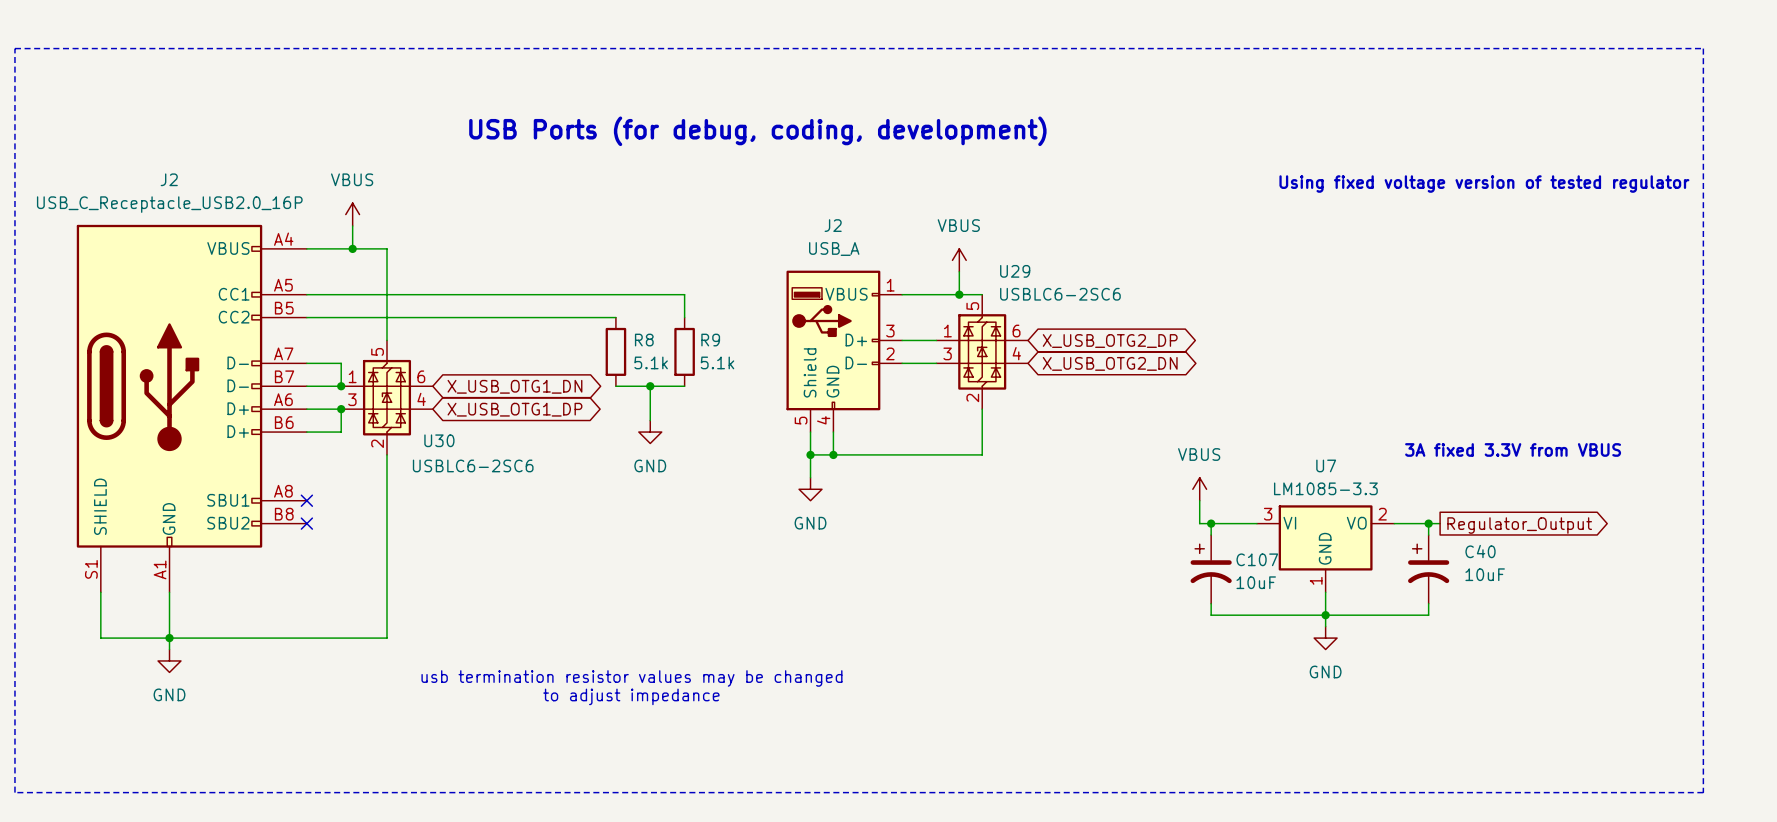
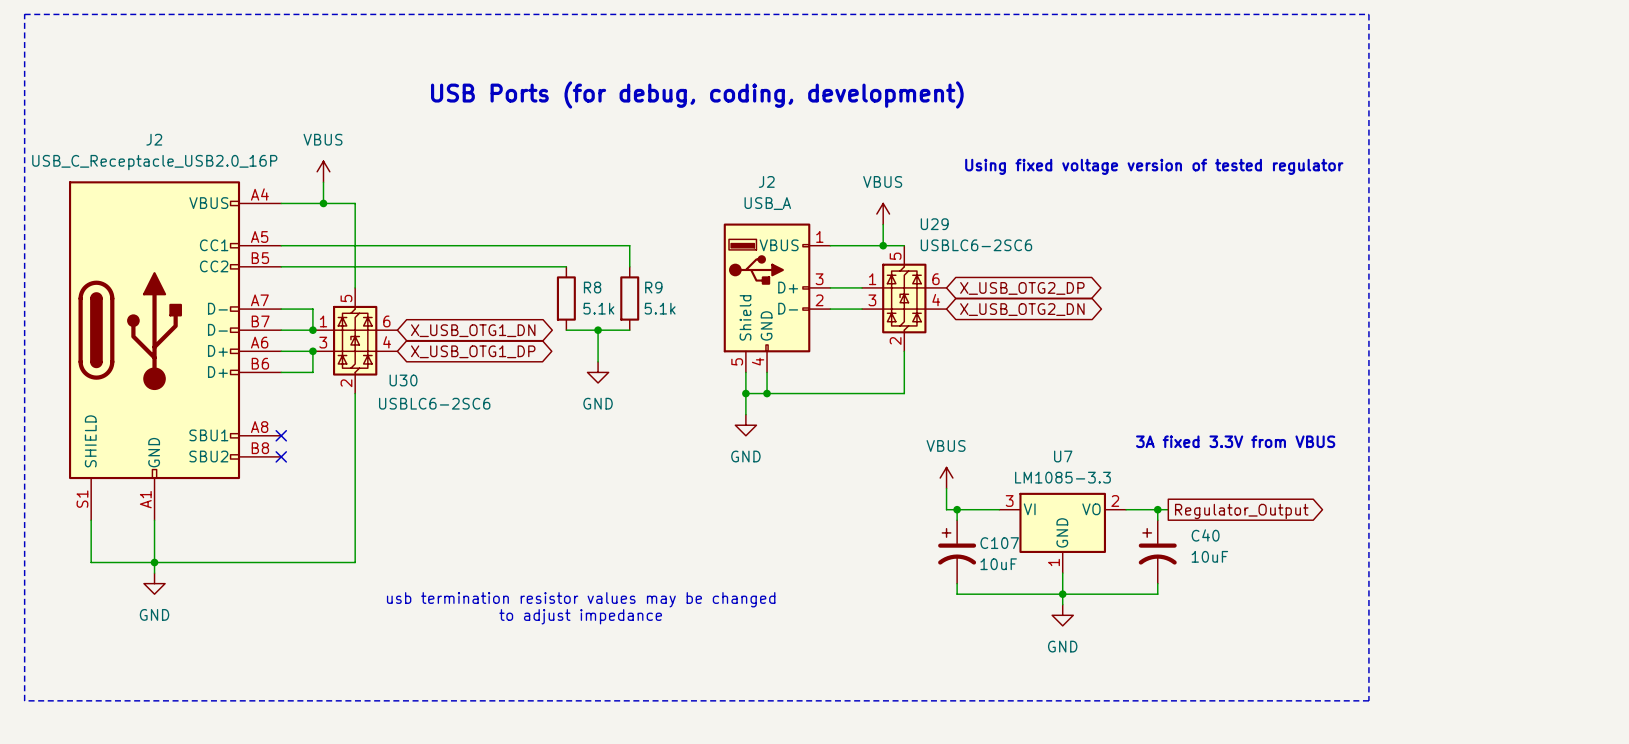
line: (14, 48) (1703, 48) (1703, 792) (14, 792) (14, 48) -> (24, 14) (24, 700) (1368, 700) (1368, 14) (24, 14)
text: Using fixed voltage version of tested regulator (1484, 184) -> none
text: none -> Using fixed voltage version of tested regulator (1154, 166)
text position: 3A fixed 3.3V from VBUS (1513, 449) -> 3A fixed 3.3V from VBUS (1235, 441)
power symbol position: VBUS (1199, 489) -> VBUS (946, 478)
wire: (1199, 500) (1199, 523) (1256, 523) -> (946, 488) (946, 509) (999, 509)
wire: (1211, 523) (1211, 535) -> (957, 509) (957, 520)
junction: (1211, 523) -> none
wire: (1394, 523) (1440, 523) -> (1126, 509) (1168, 509)
wire: (1428, 523) (1428, 535) -> (1157, 509) (1157, 520)
junction: (1428, 523) -> none
global label position: Regulator_Output (1519, 525) -> Regulator_Output (1241, 511)
U7 position: (1325, 548) -> (1062, 532)
C107 position: (1211, 569) -> (957, 551)
C40 position: (1428, 569) -> (1157, 551)
junction: none -> (957, 509)
junction: none -> (1157, 509)
wire: (1325, 592) (1325, 626) -> (1062, 573) (1062, 604)
wire: (1211, 603) (1211, 615) (1428, 615) (1428, 603) -> (957, 583) (957, 594) (1157, 594) (1157, 583)
junction: (1325, 615) -> none
power symbol position: GND (1325, 638) -> GND (1062, 615)
junction: none -> (1062, 594)

